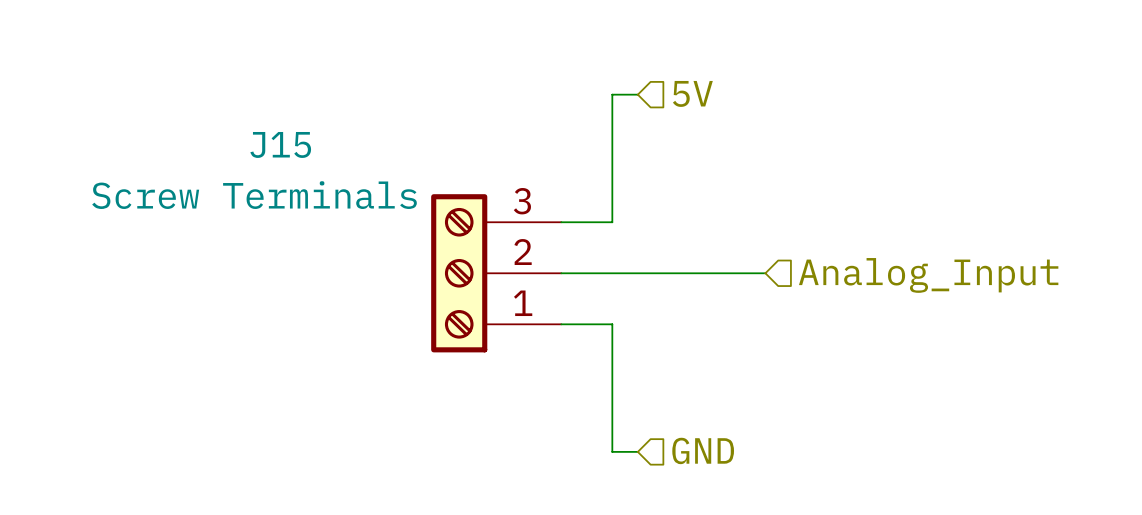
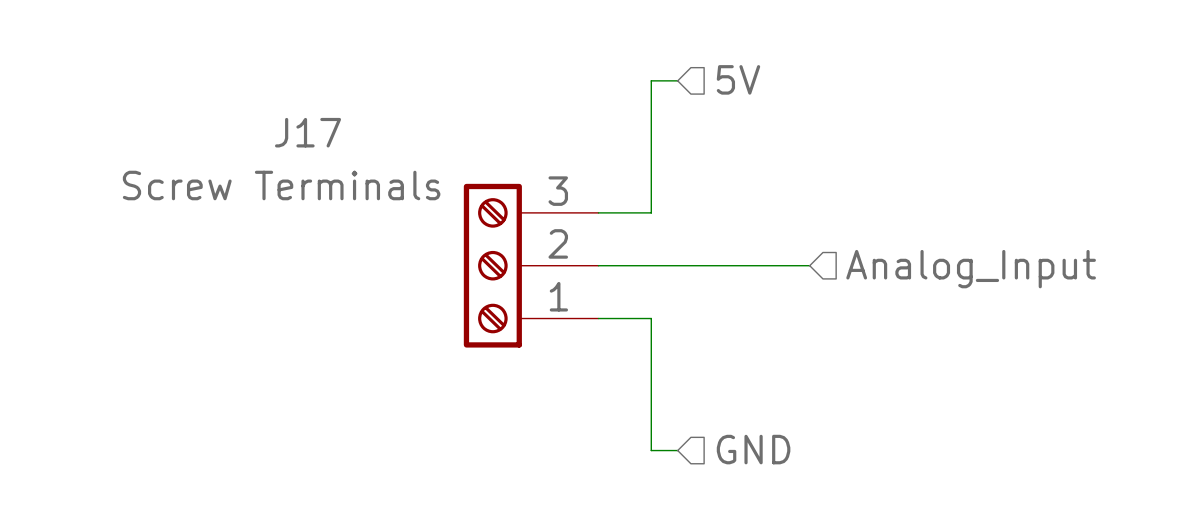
J15 name: J15 (280, 144) -> J17 (308, 132)

